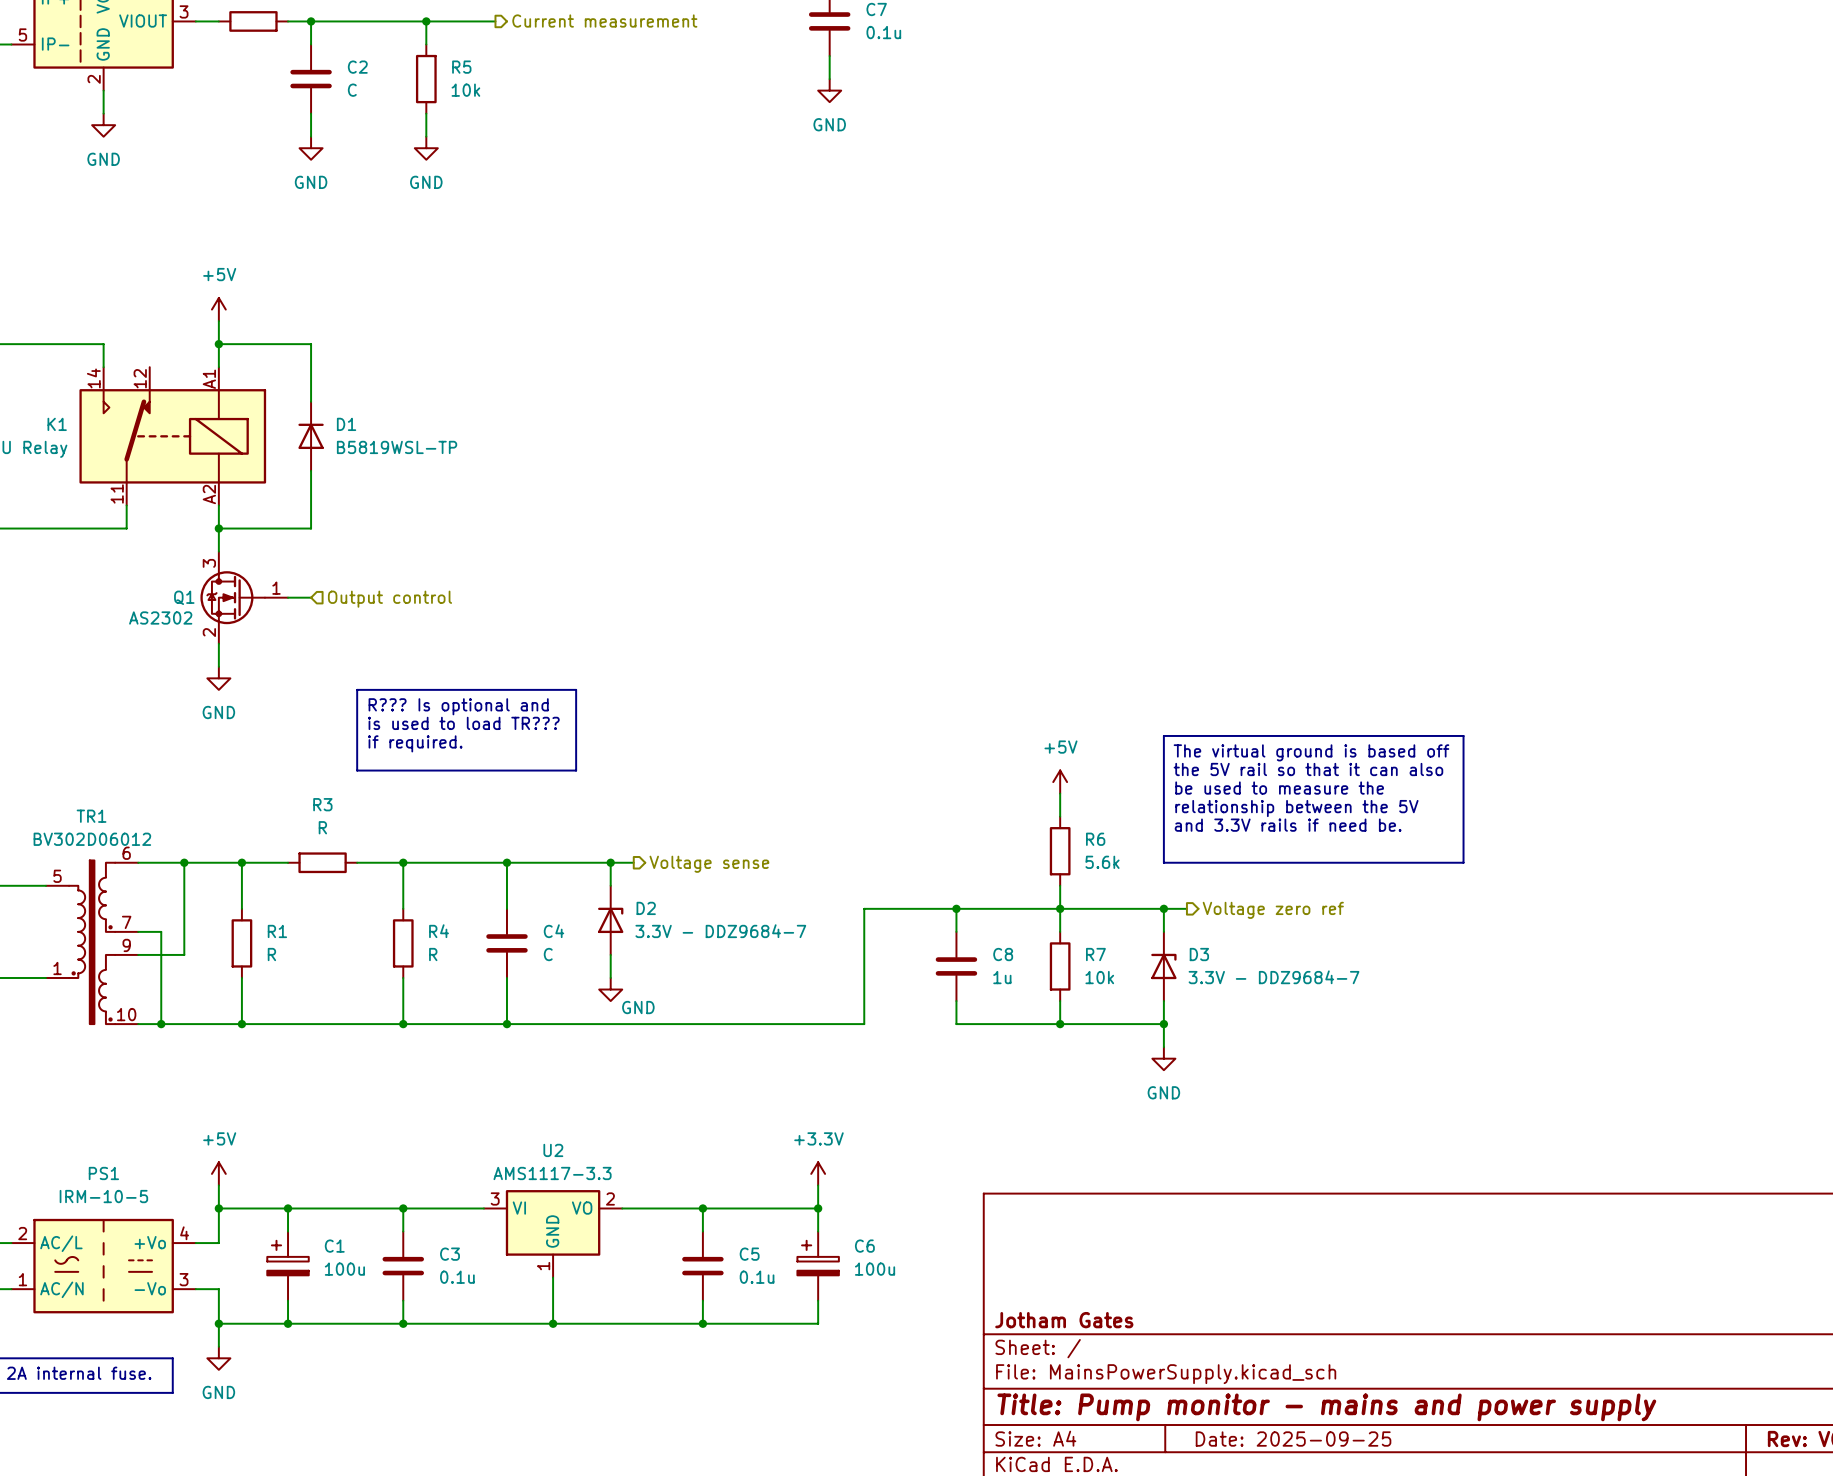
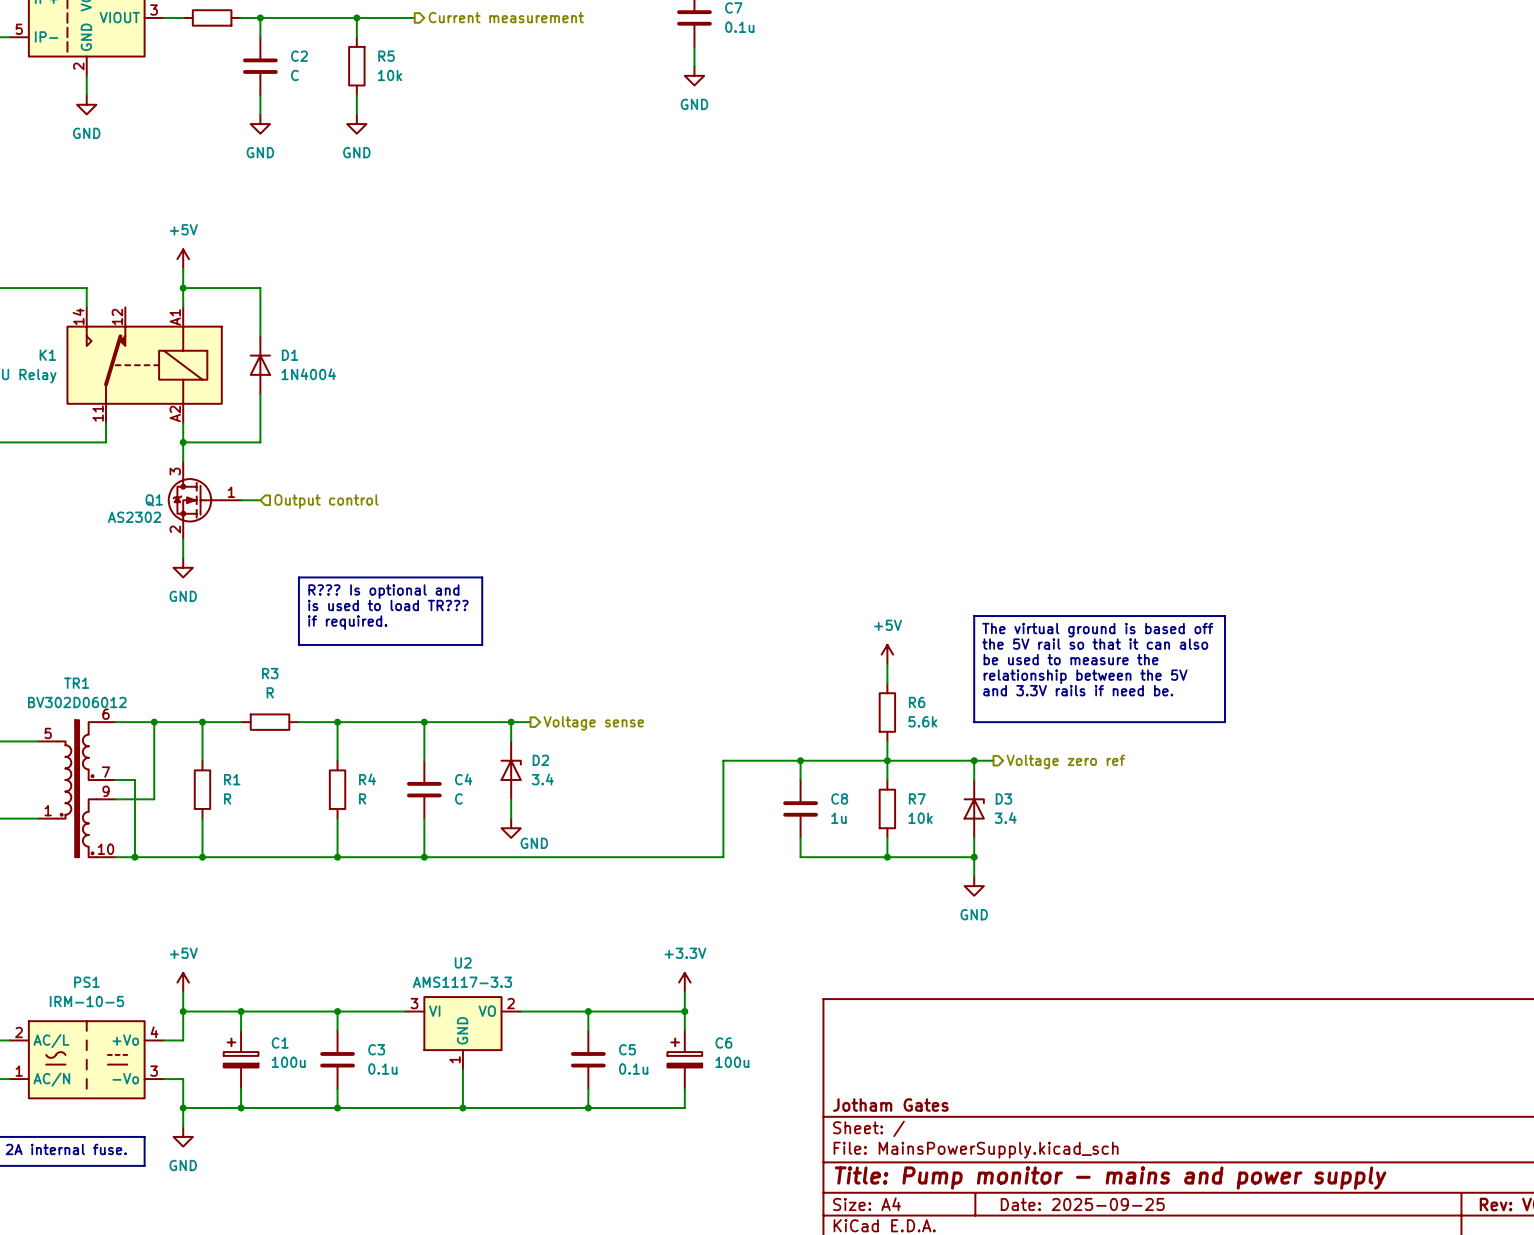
D1 value: B5819WSL-TP (397, 447) -> 1N4004 (308, 374)
D2 value: 3.3V - DDZ9684-7 (720, 931) -> 3.4 (542, 779)
D3 value: 3.3V - DDZ9684-7 (1274, 977) -> 3.4 (1005, 818)

